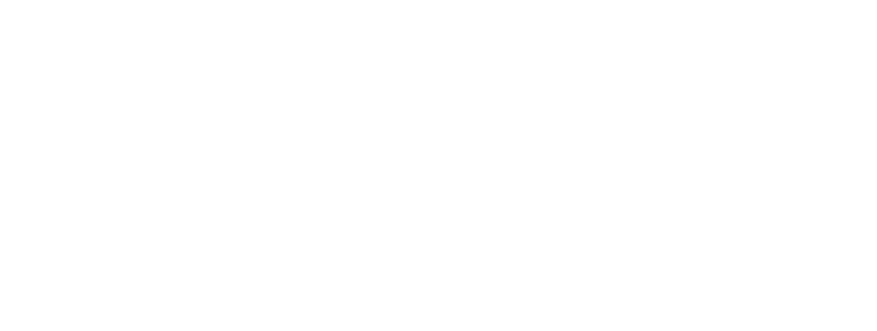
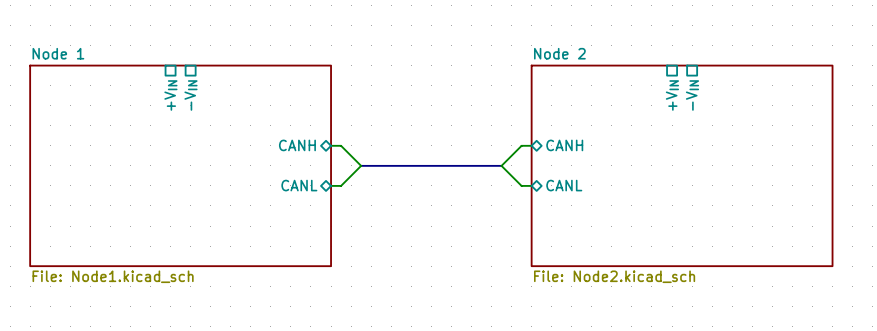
sheet pin: none -> -VIN (190, 95)
sheet pin: none -> -VIN (692, 95)
sheet pin: none -> +VIN (170, 95)
sheet pin: none -> +VIN (672, 95)
sheet pin: none -> CANH (297, 145)
wire: none -> (331, 145) (341, 145) (361, 165) (341, 185) (331, 185)
wire: none -> (531, 145) (521, 145) (501, 165) (521, 185) (531, 185)
sheet pin: none -> CANH (564, 145)
sheet Node 1: none -> File: Node1.kicad_sch (180, 165)
bus: none -> (361, 165) (501, 165)
sheet Node 2: none -> File: Node2.kicad_sch (682, 165)
sheet pin: none -> CANL (299, 185)
sheet pin: none -> CANL (564, 185)

